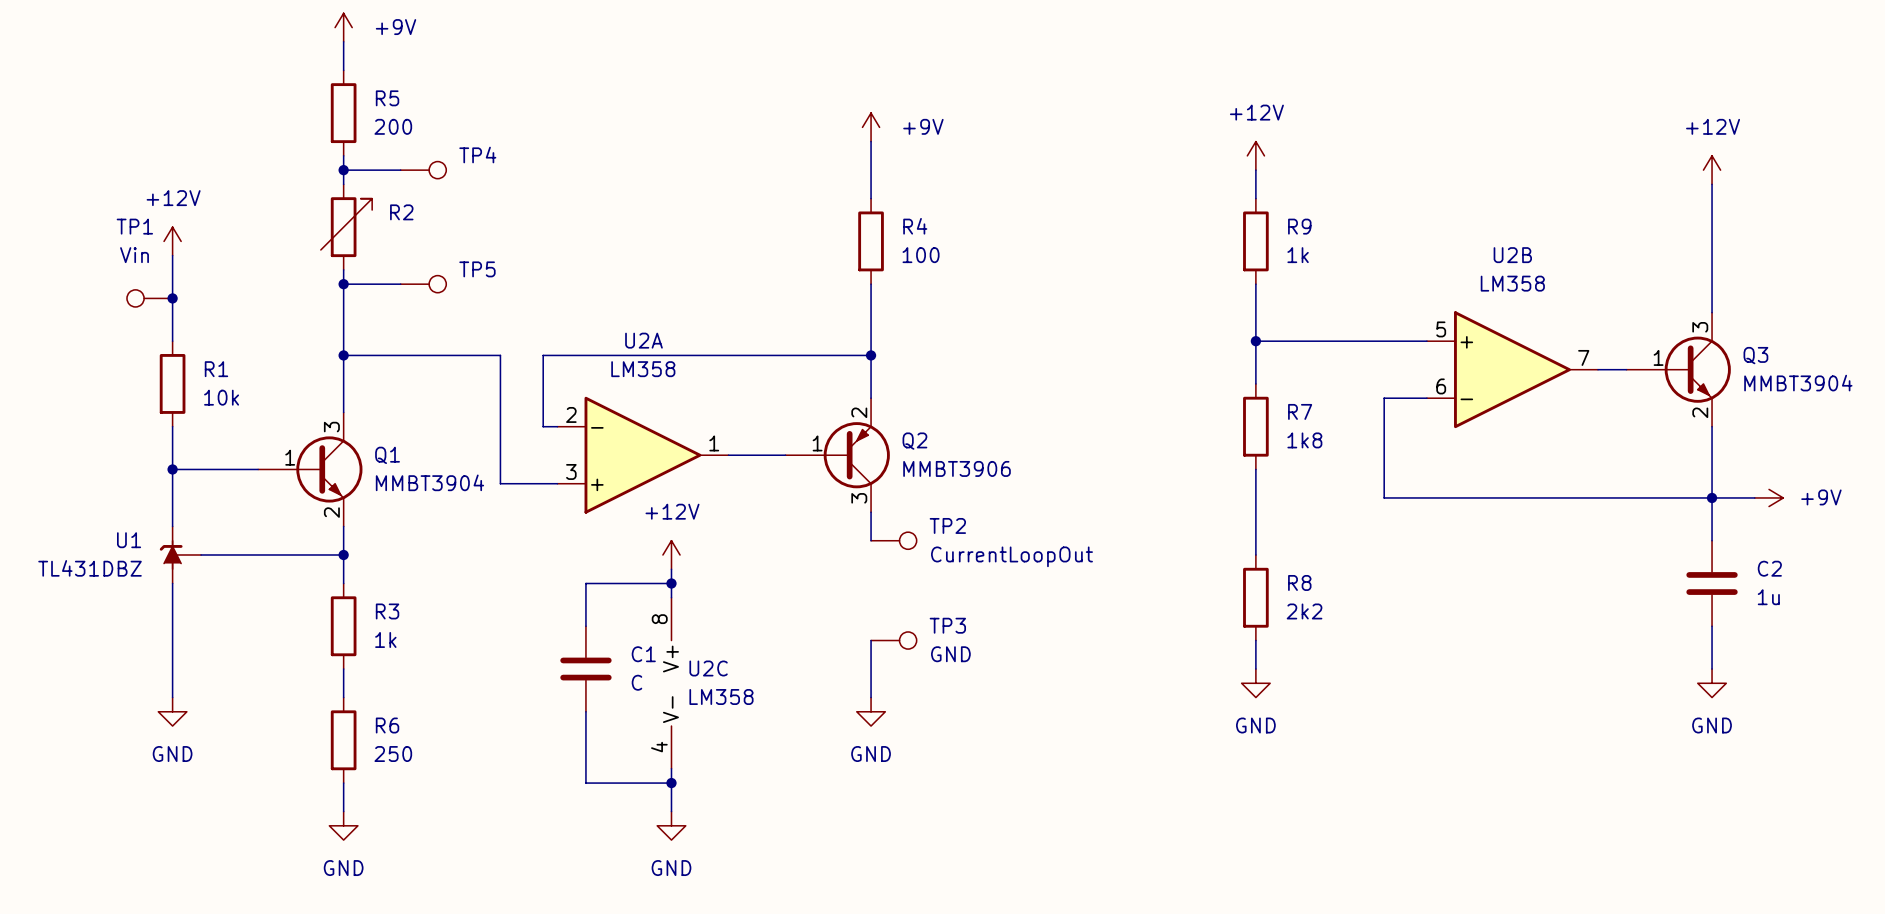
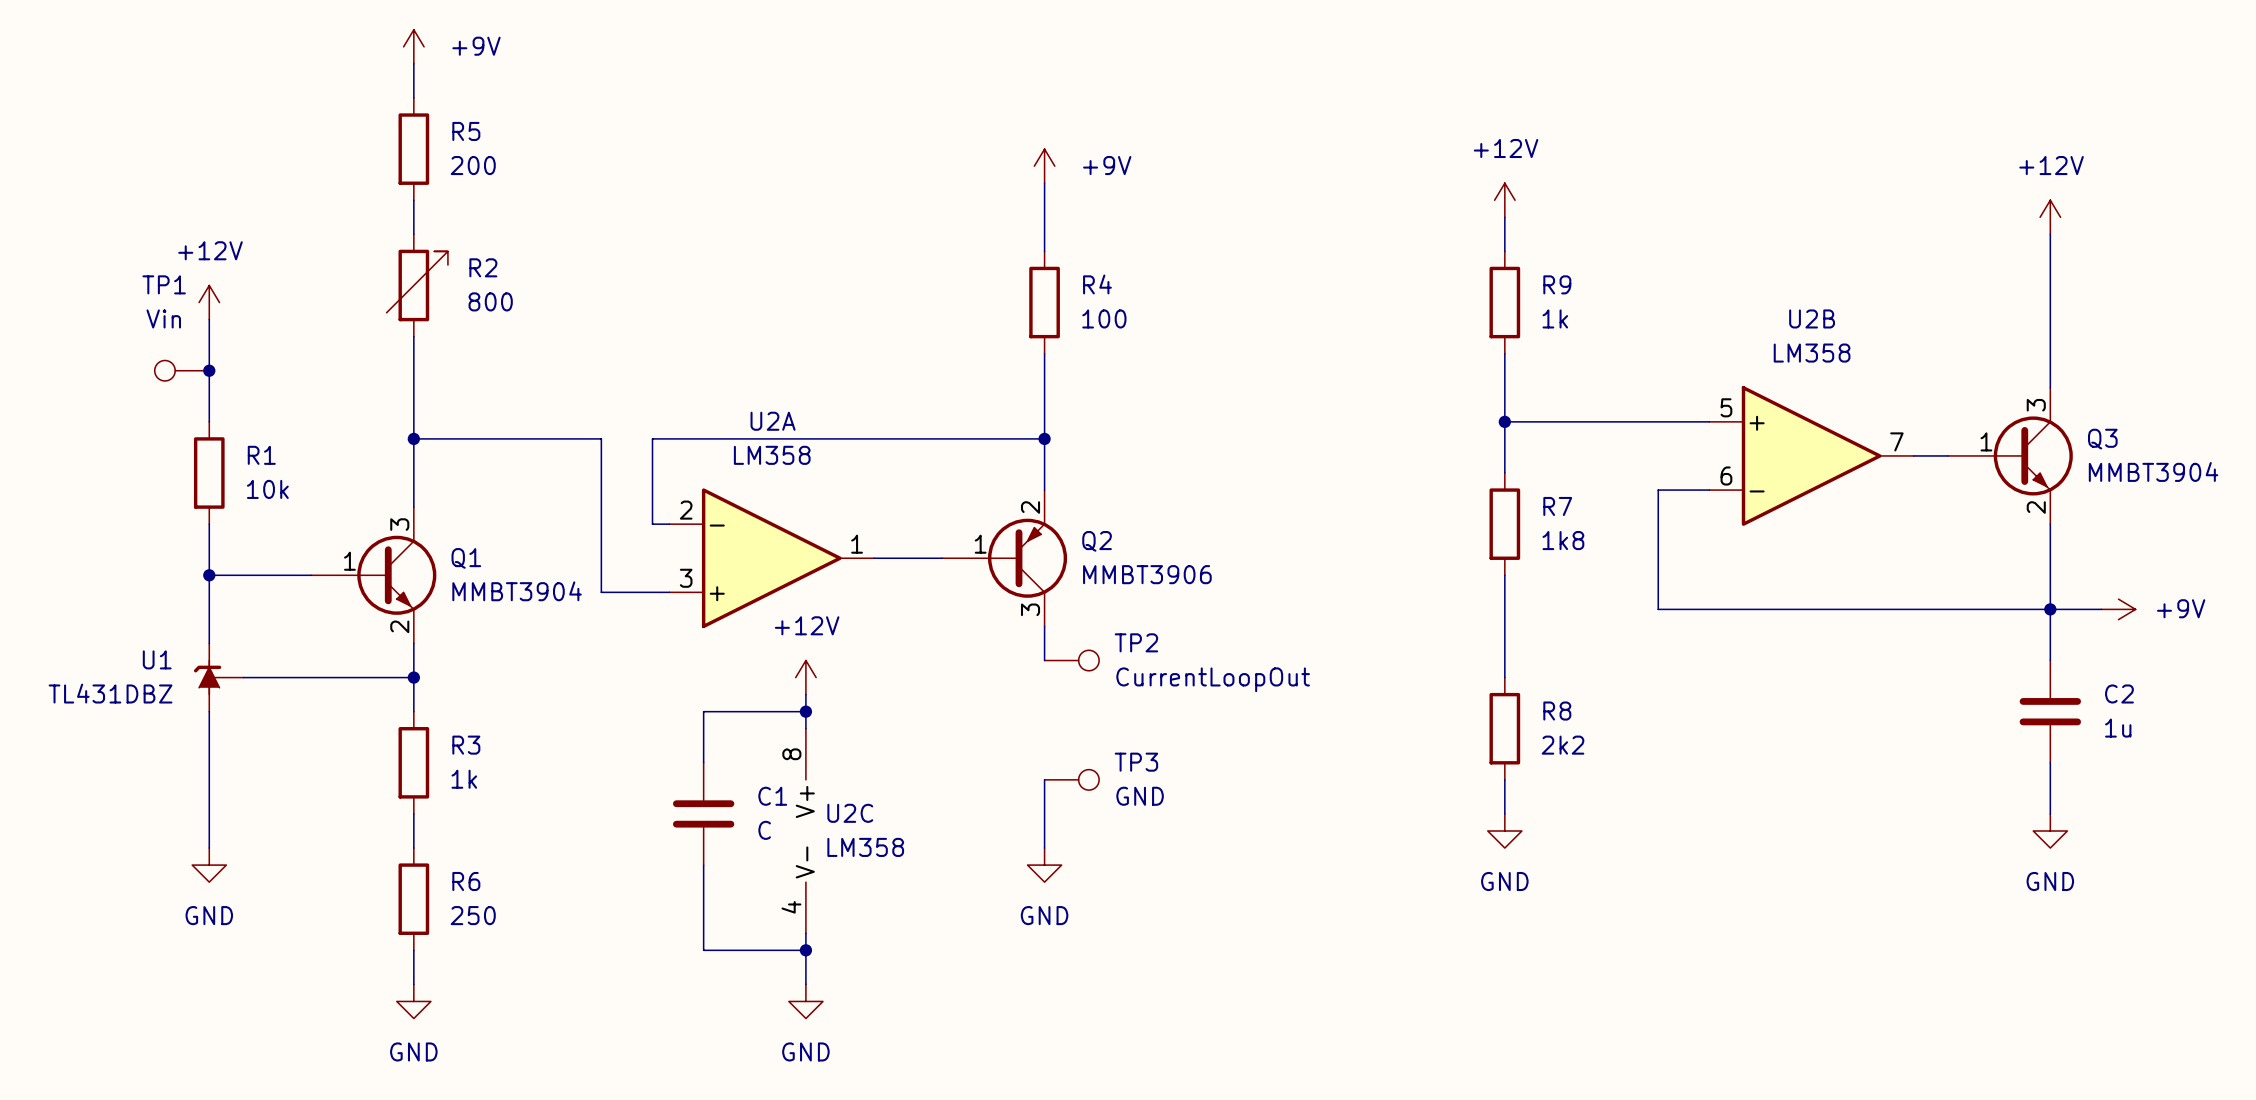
wire: (343, 170) (400, 170) -> none
junction: (343, 170) -> none
TP4: (423, 170) -> none
R2 value: none -> 800 (490, 301)
wire: (343, 284) (400, 284) -> none
junction: (343, 284) -> none
TP5: (423, 284) -> none

